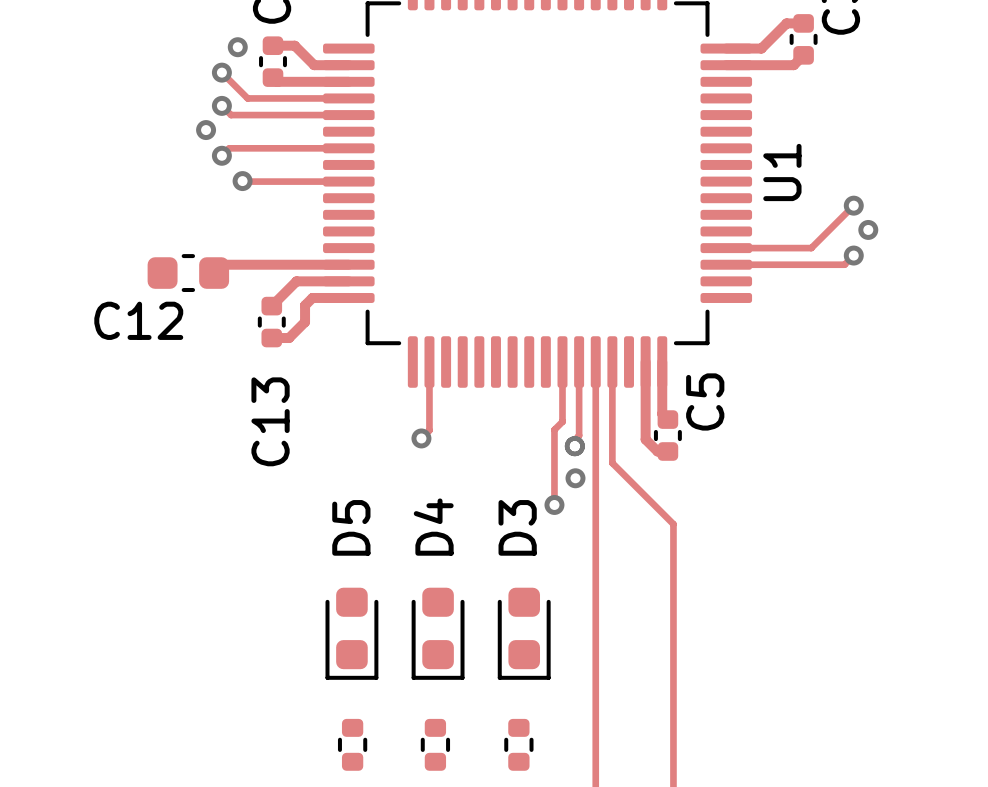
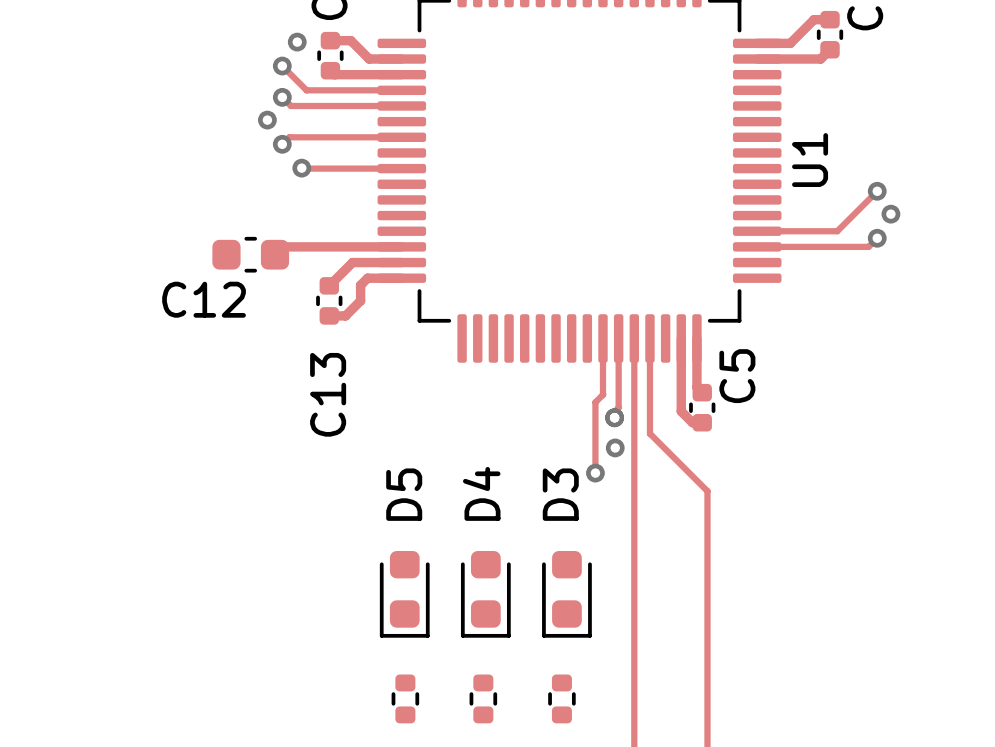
track: (429, 362) (429, 430) (421, 438) -> none
via: (421, 438) -> none

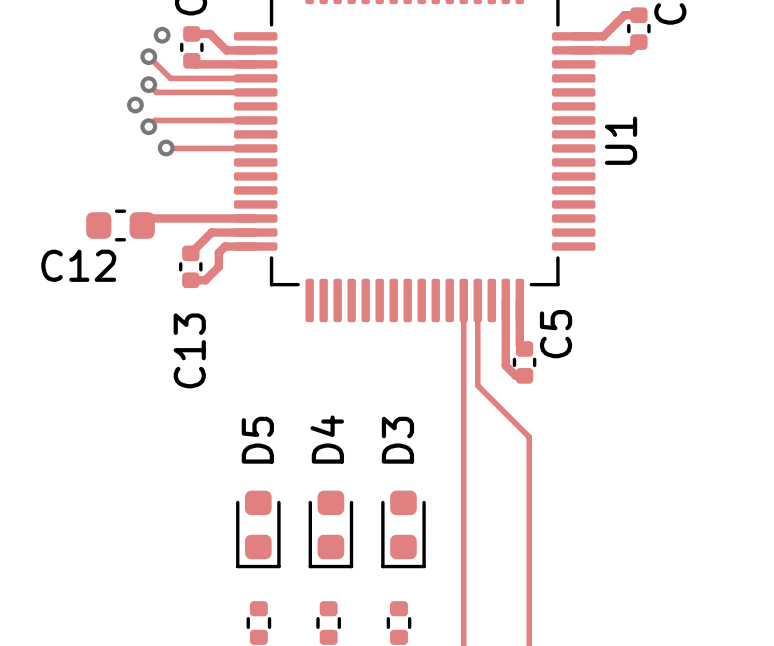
track: (877, 191) (837, 231) (757, 231) -> none
via: (877, 191) -> none
via: (890, 214) -> none
track: (877, 238) (868, 246) (757, 246) -> none
via: (877, 238) -> none
track: (602, 338) (602, 394) -> none
track: (618, 338) (618, 407) (616, 409) -> none
track: (603, 394) (595, 402) (595, 473) -> none
via: (614, 417) -> none
via: (615, 447) -> none
via: (595, 473) -> none

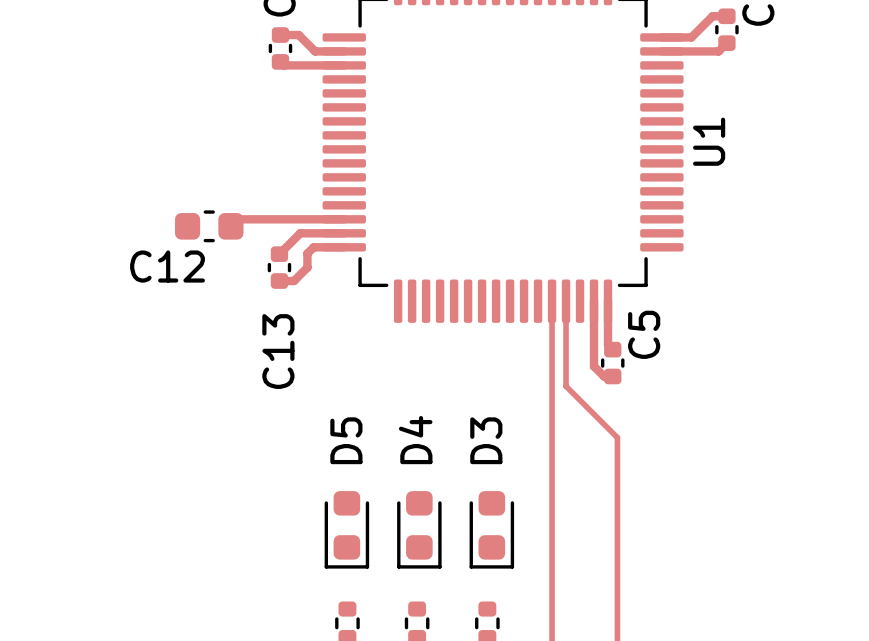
via: (162, 35) -> none
track: (148, 56) (170, 78) (255, 78) -> none
via: (148, 56) -> none
track: (148, 84) (156, 92) (255, 92) -> none
via: (148, 84) -> none
via: (135, 105) -> none
track: (255, 120) (155, 120) (148, 126) -> none
via: (148, 126) -> none
track: (166, 148) (255, 148) -> none
via: (166, 148) -> none

